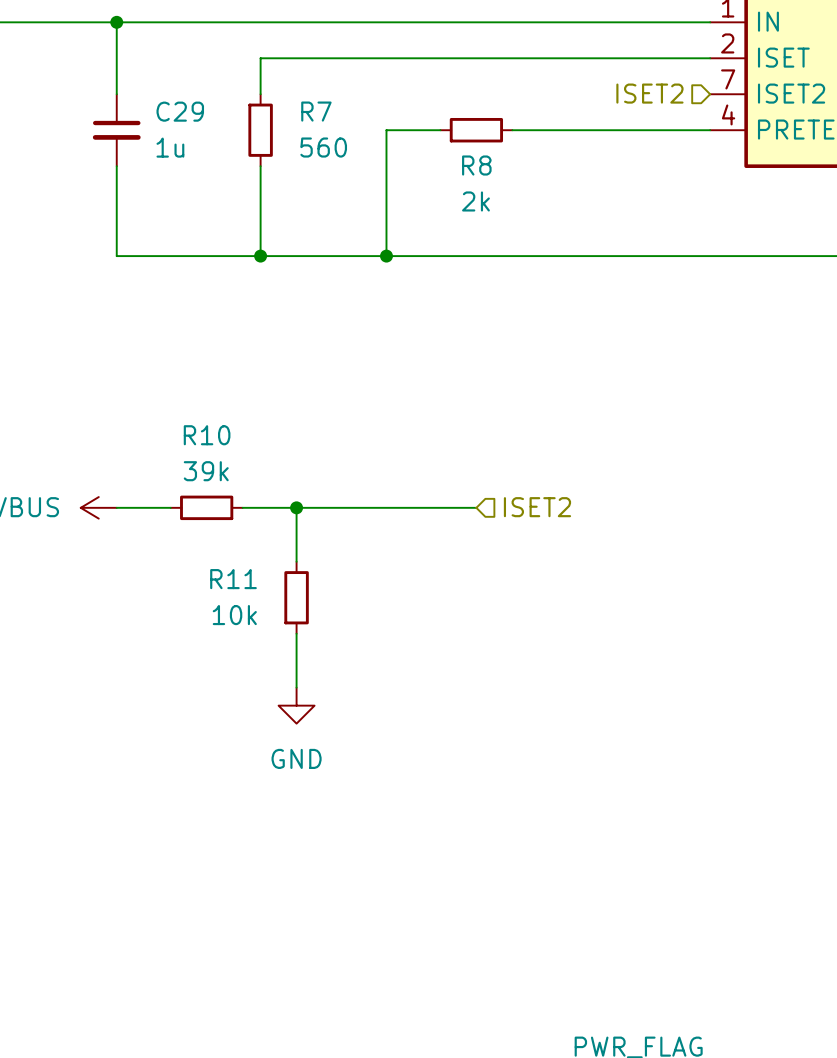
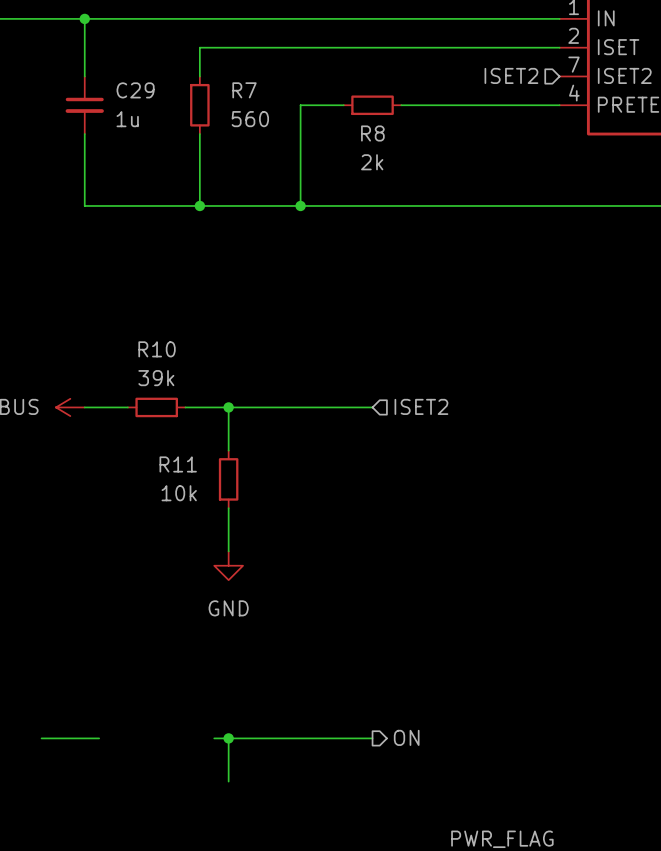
hierarchical label: none -> ON (406, 737)
wire: none -> (41, 738) (99, 738)
wire: none -> (214, 738) (372, 738)
wire: none -> (228, 738) (228, 781)
junction: none -> (228, 738)

